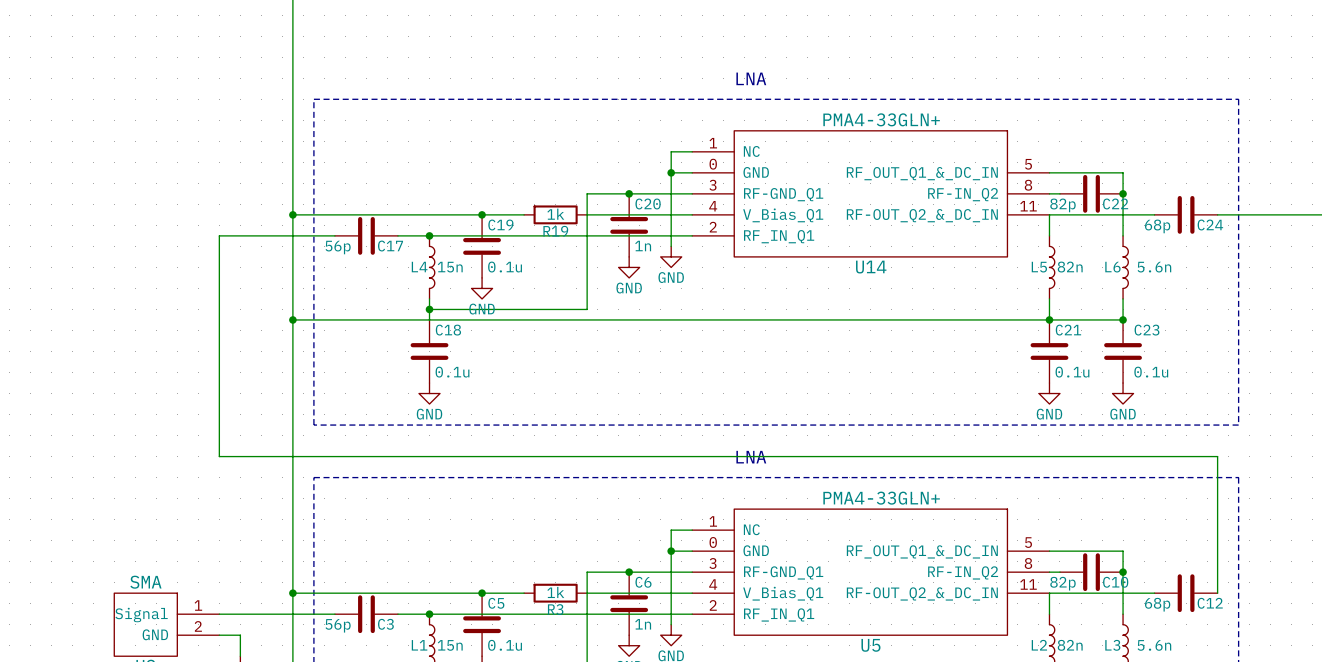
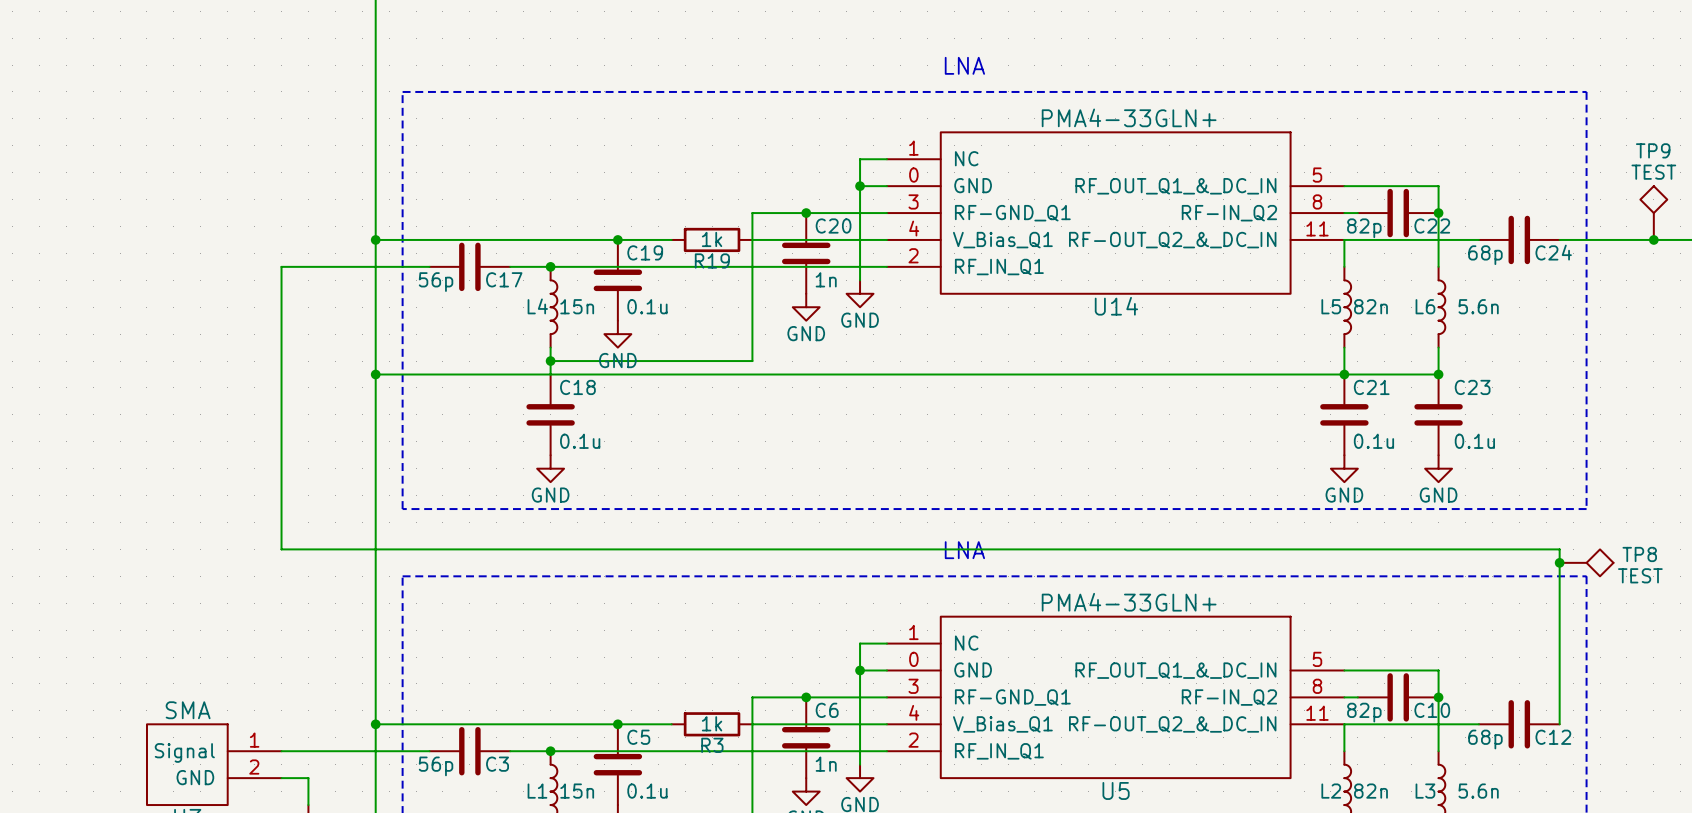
TP9: none -> TEST (1653, 213)
junction: none -> (1653, 239)
junction: none -> (1559, 562)
TP8: none -> TEST (1586, 562)

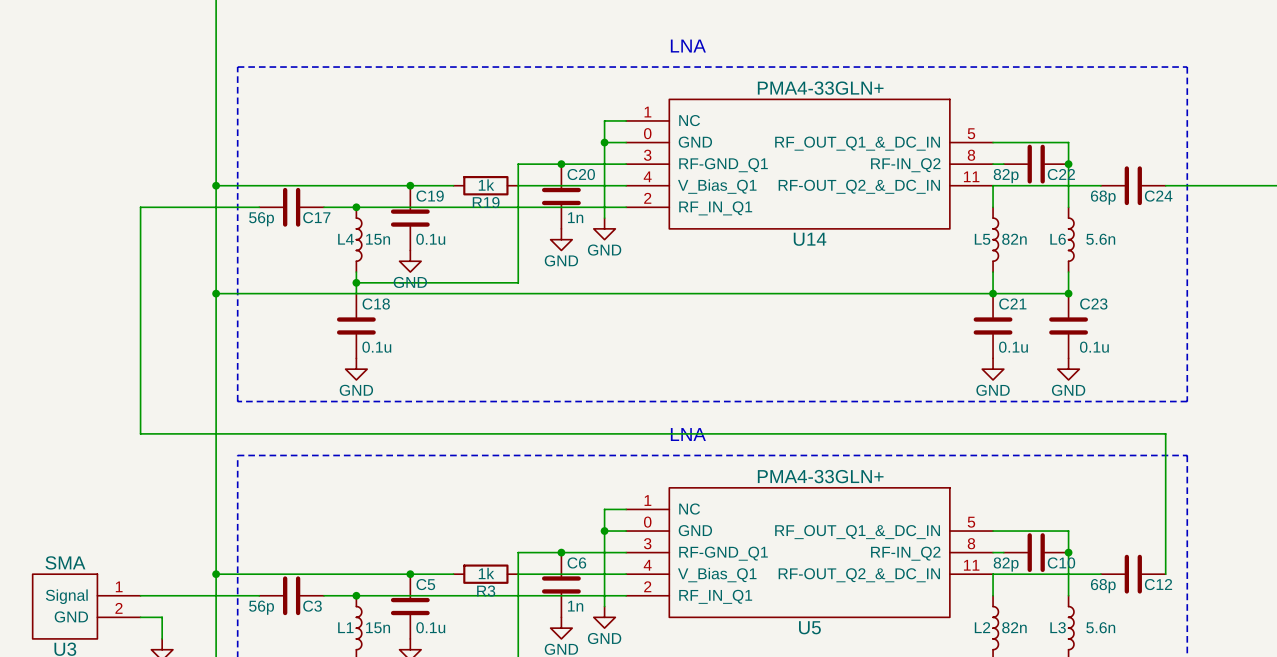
TP9: TEST (1653, 213) -> none
junction: (1653, 239) -> none
junction: (1559, 562) -> none
TP8: TEST (1586, 562) -> none

